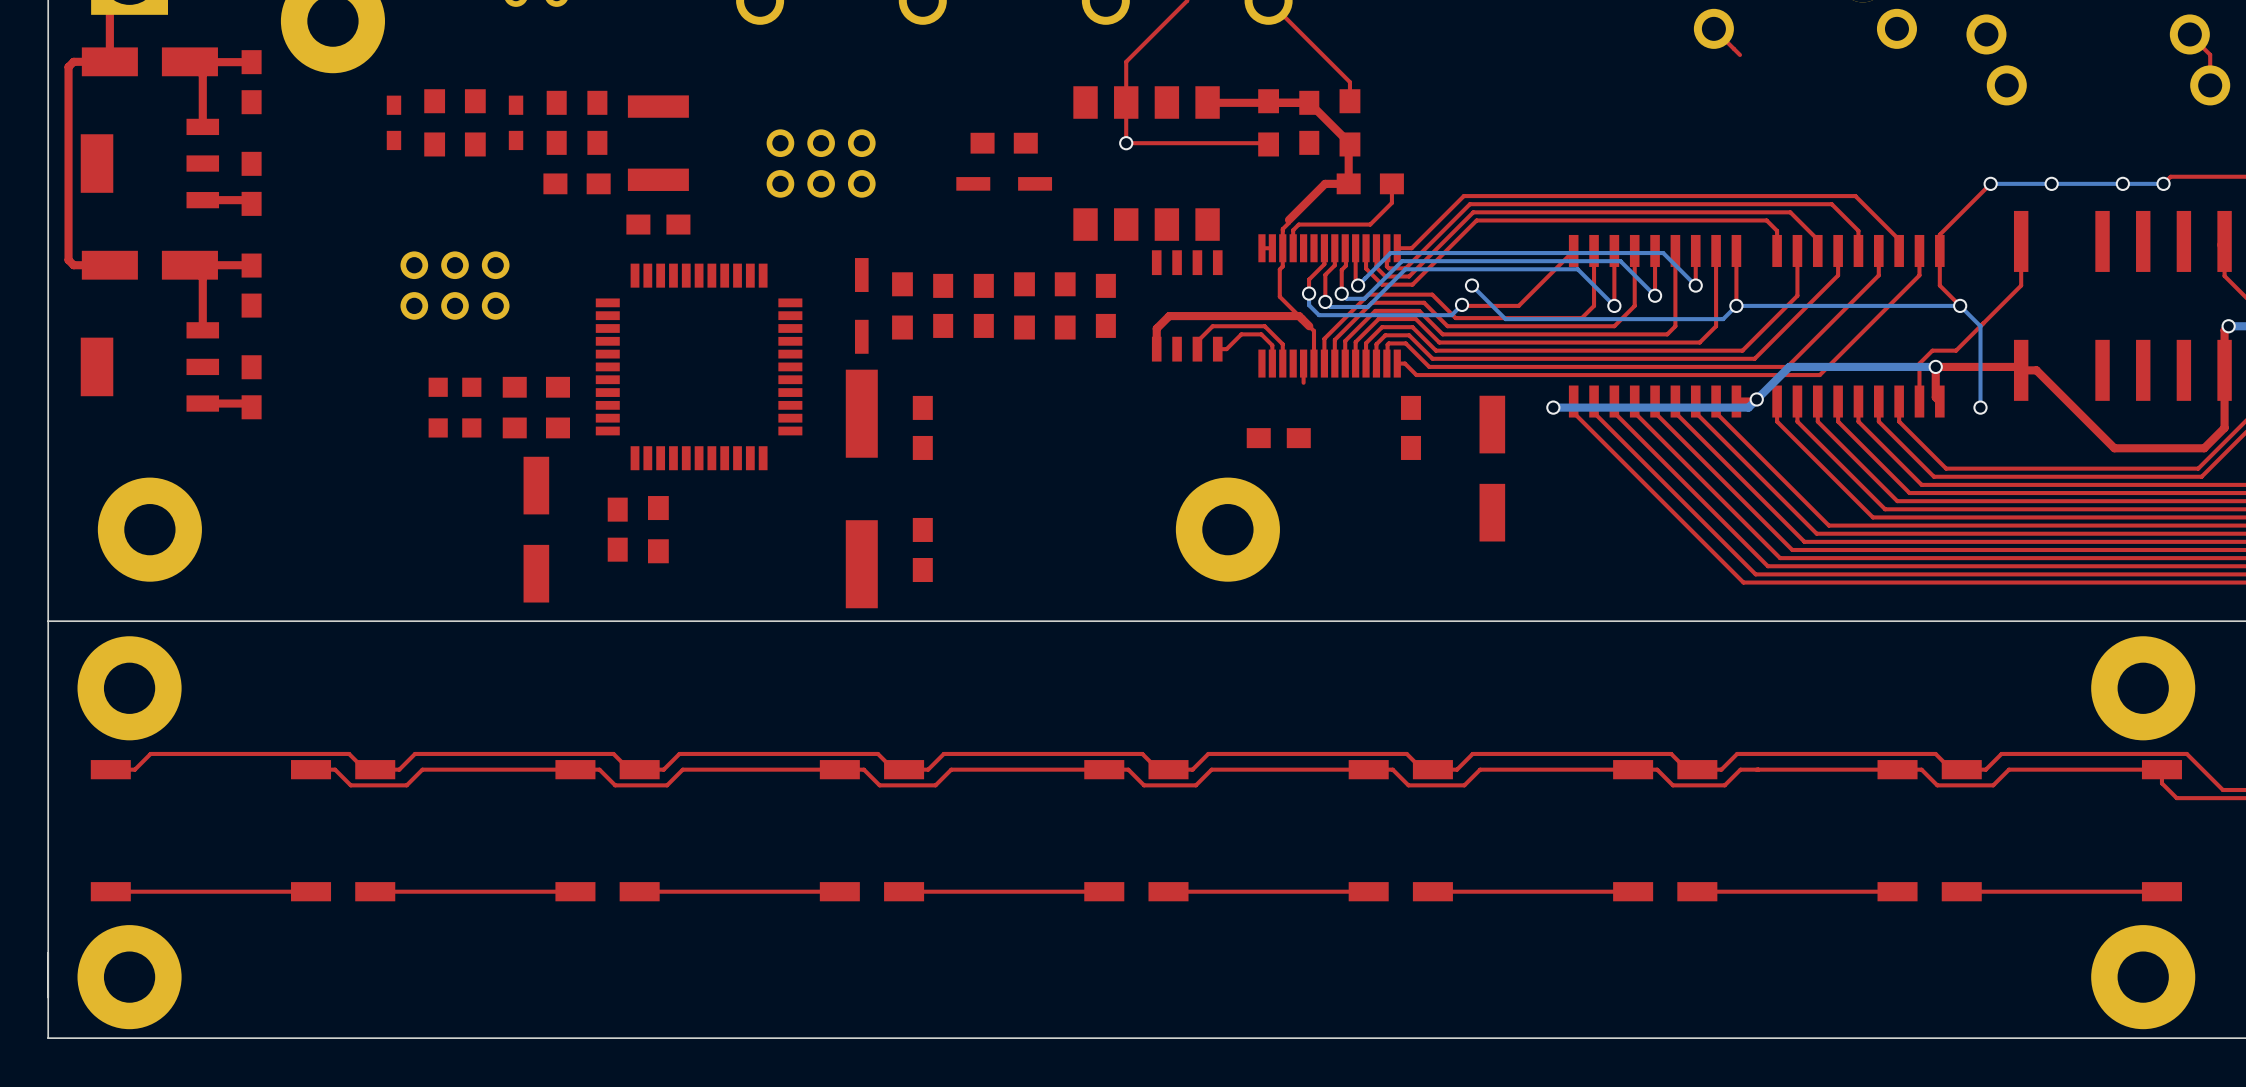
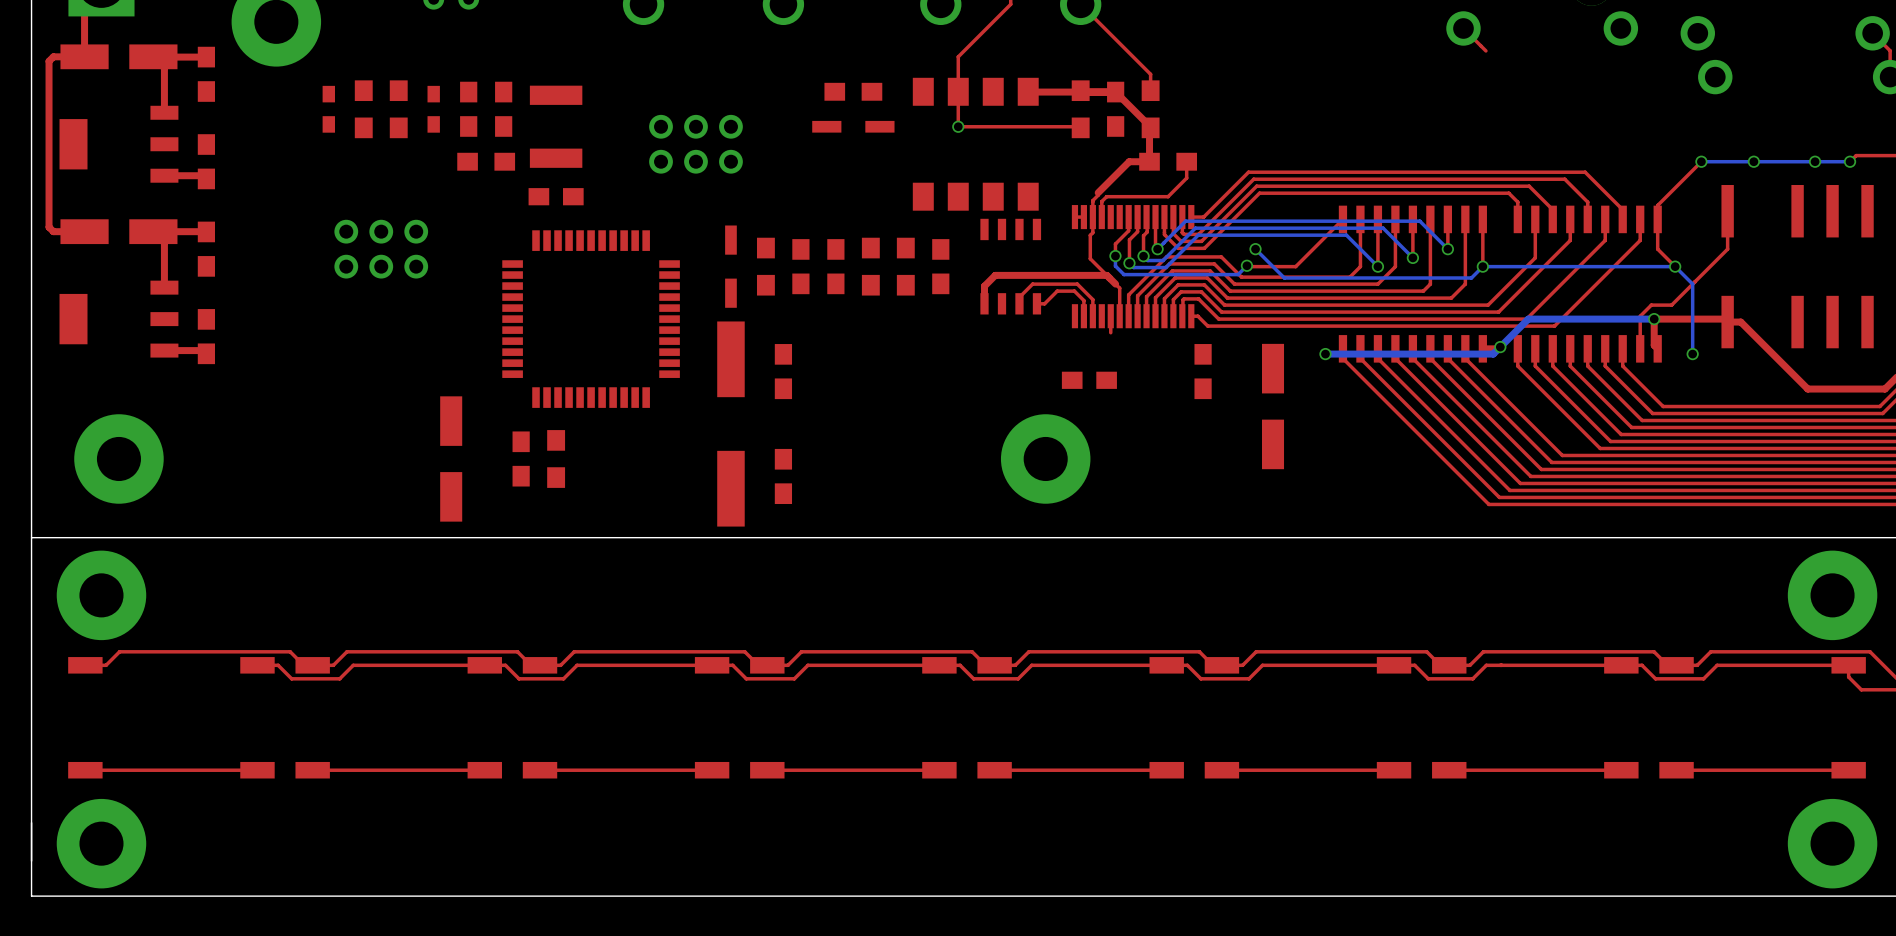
part: none -> (853, 91)
part footprint: [970, 132, 1038, 154] -> [812, 120, 895, 133]
part: (1004, 183) -> none
part: (455, 387) -> none
part: (536, 387) -> none
part: (455, 427) -> none
part: (536, 427) -> none

